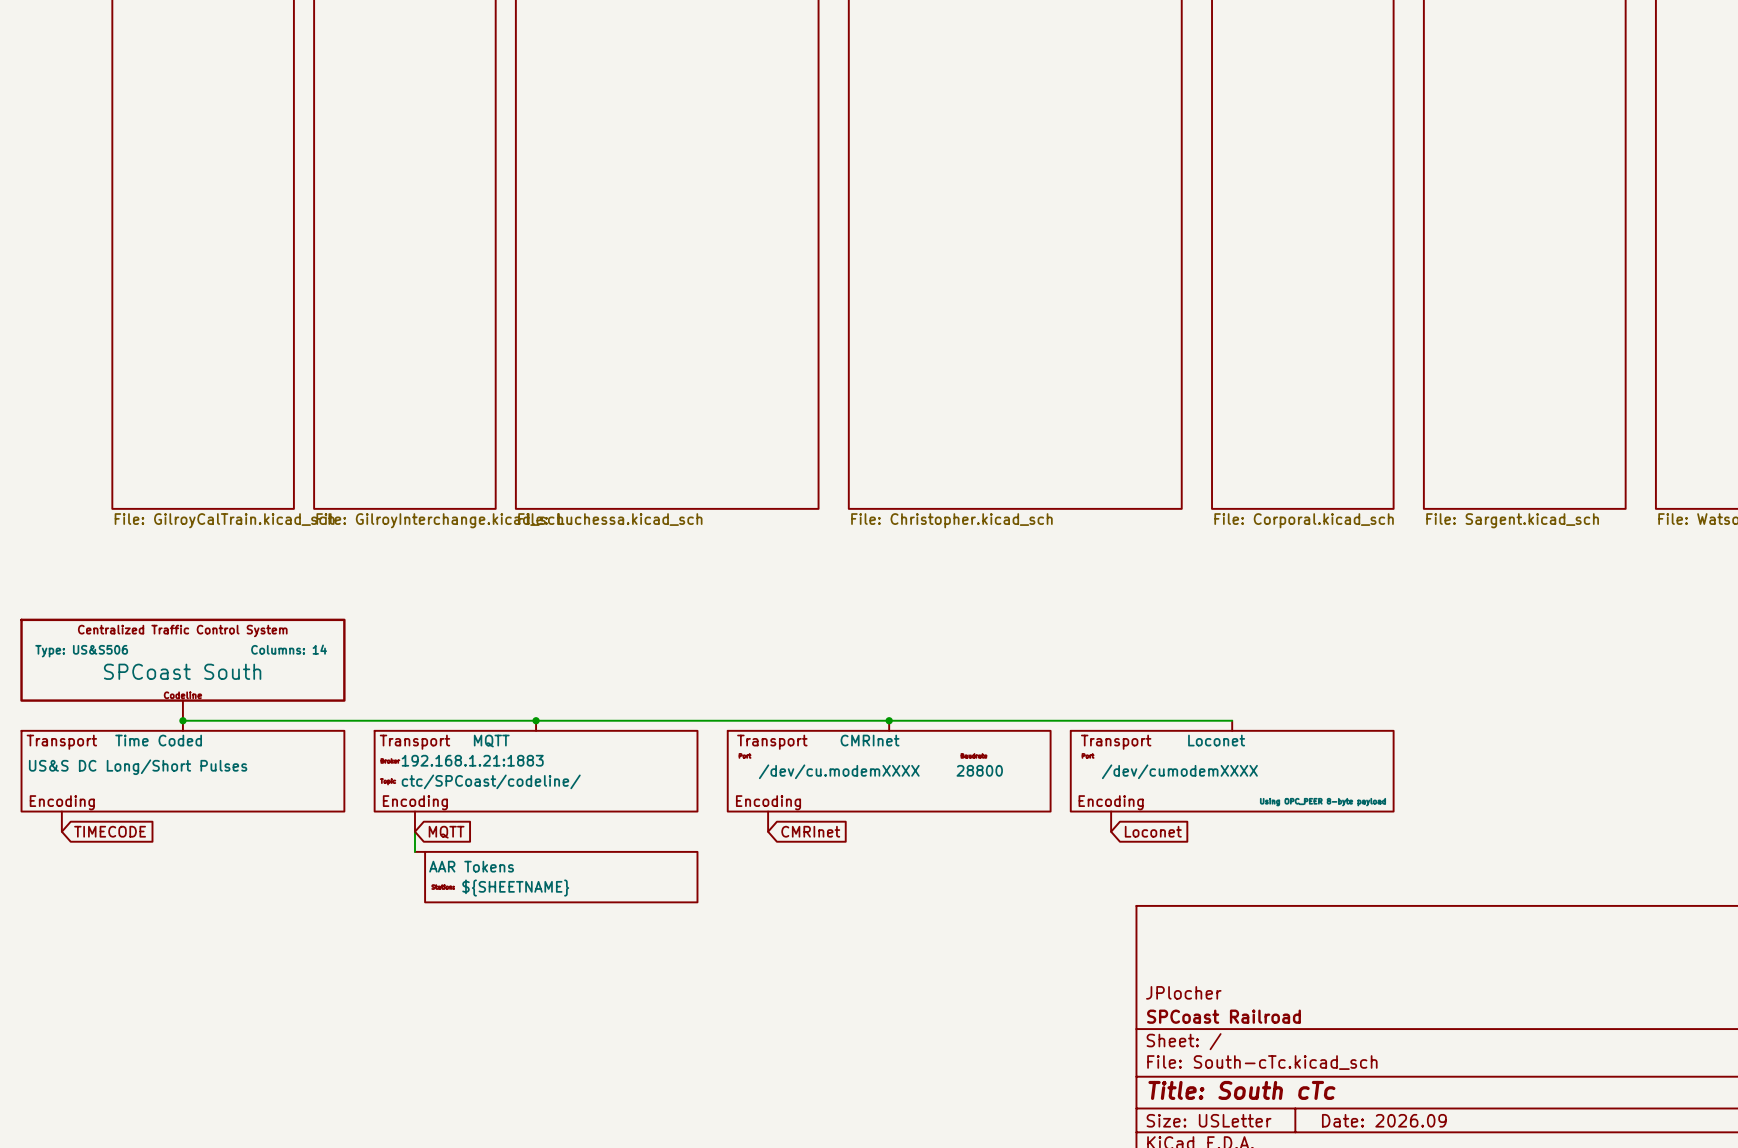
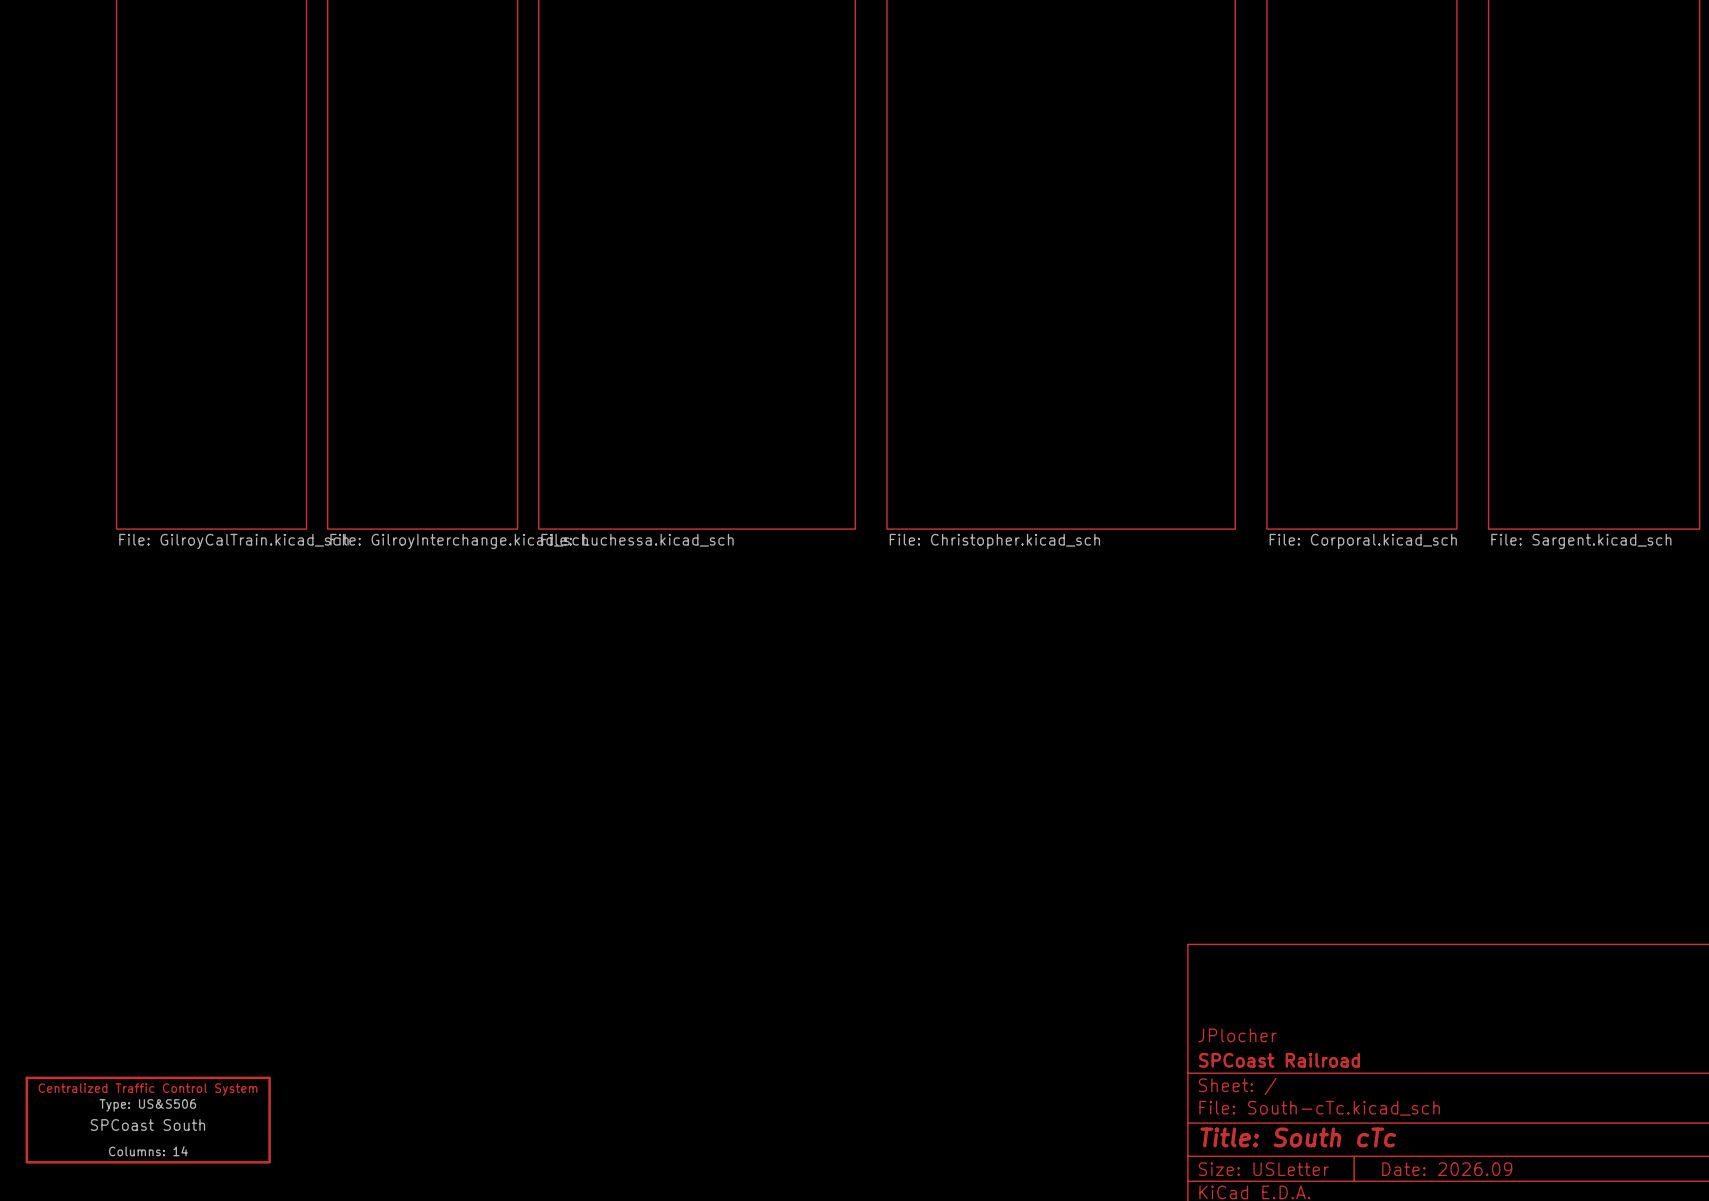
part: SPCoast South (182, 669) -> none
wire: (182, 720) (1232, 720) -> none
junction: (182, 720) -> none
junction: (536, 720) -> none
junction: (889, 720) -> none
part: Time Coded (182, 776) -> none
part: MQTT (536, 776) -> none
part: CMRInet (889, 776) -> none
part: Loconet (1232, 776) -> none
global label: TIMECODE (110, 831) -> none
wire: (414, 831) (414, 851) -> none
global label: CMRInet (810, 831) -> none
global label: Loconet (1153, 831) -> none
global label: MQTT (446, 832) -> none
part: AAR Tokens (556, 877) -> none
part: none -> SPCoast South (148, 1120)

